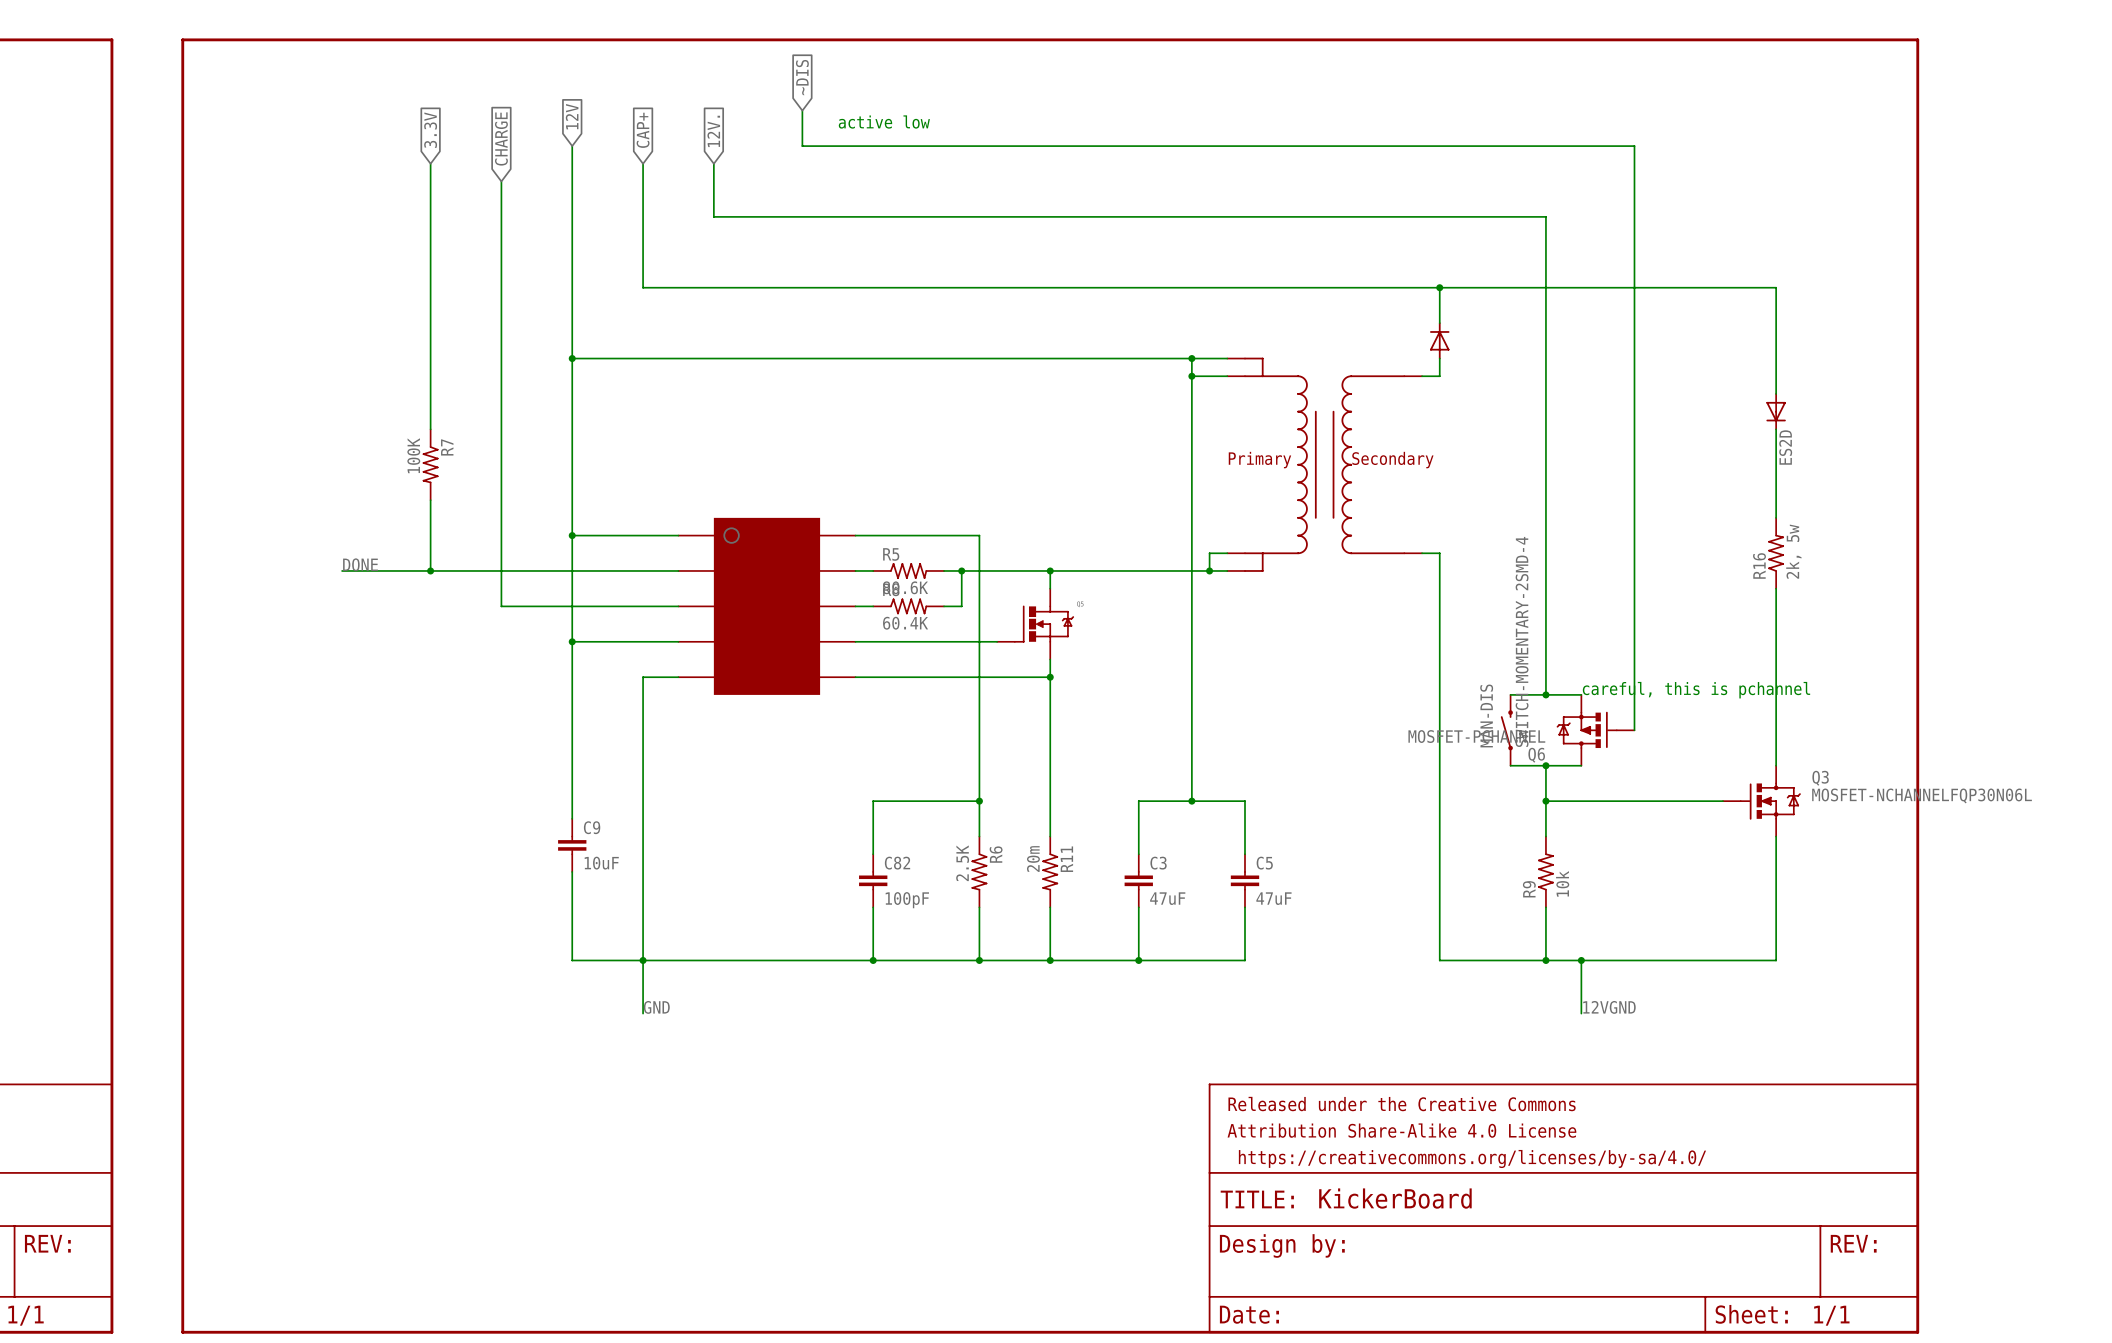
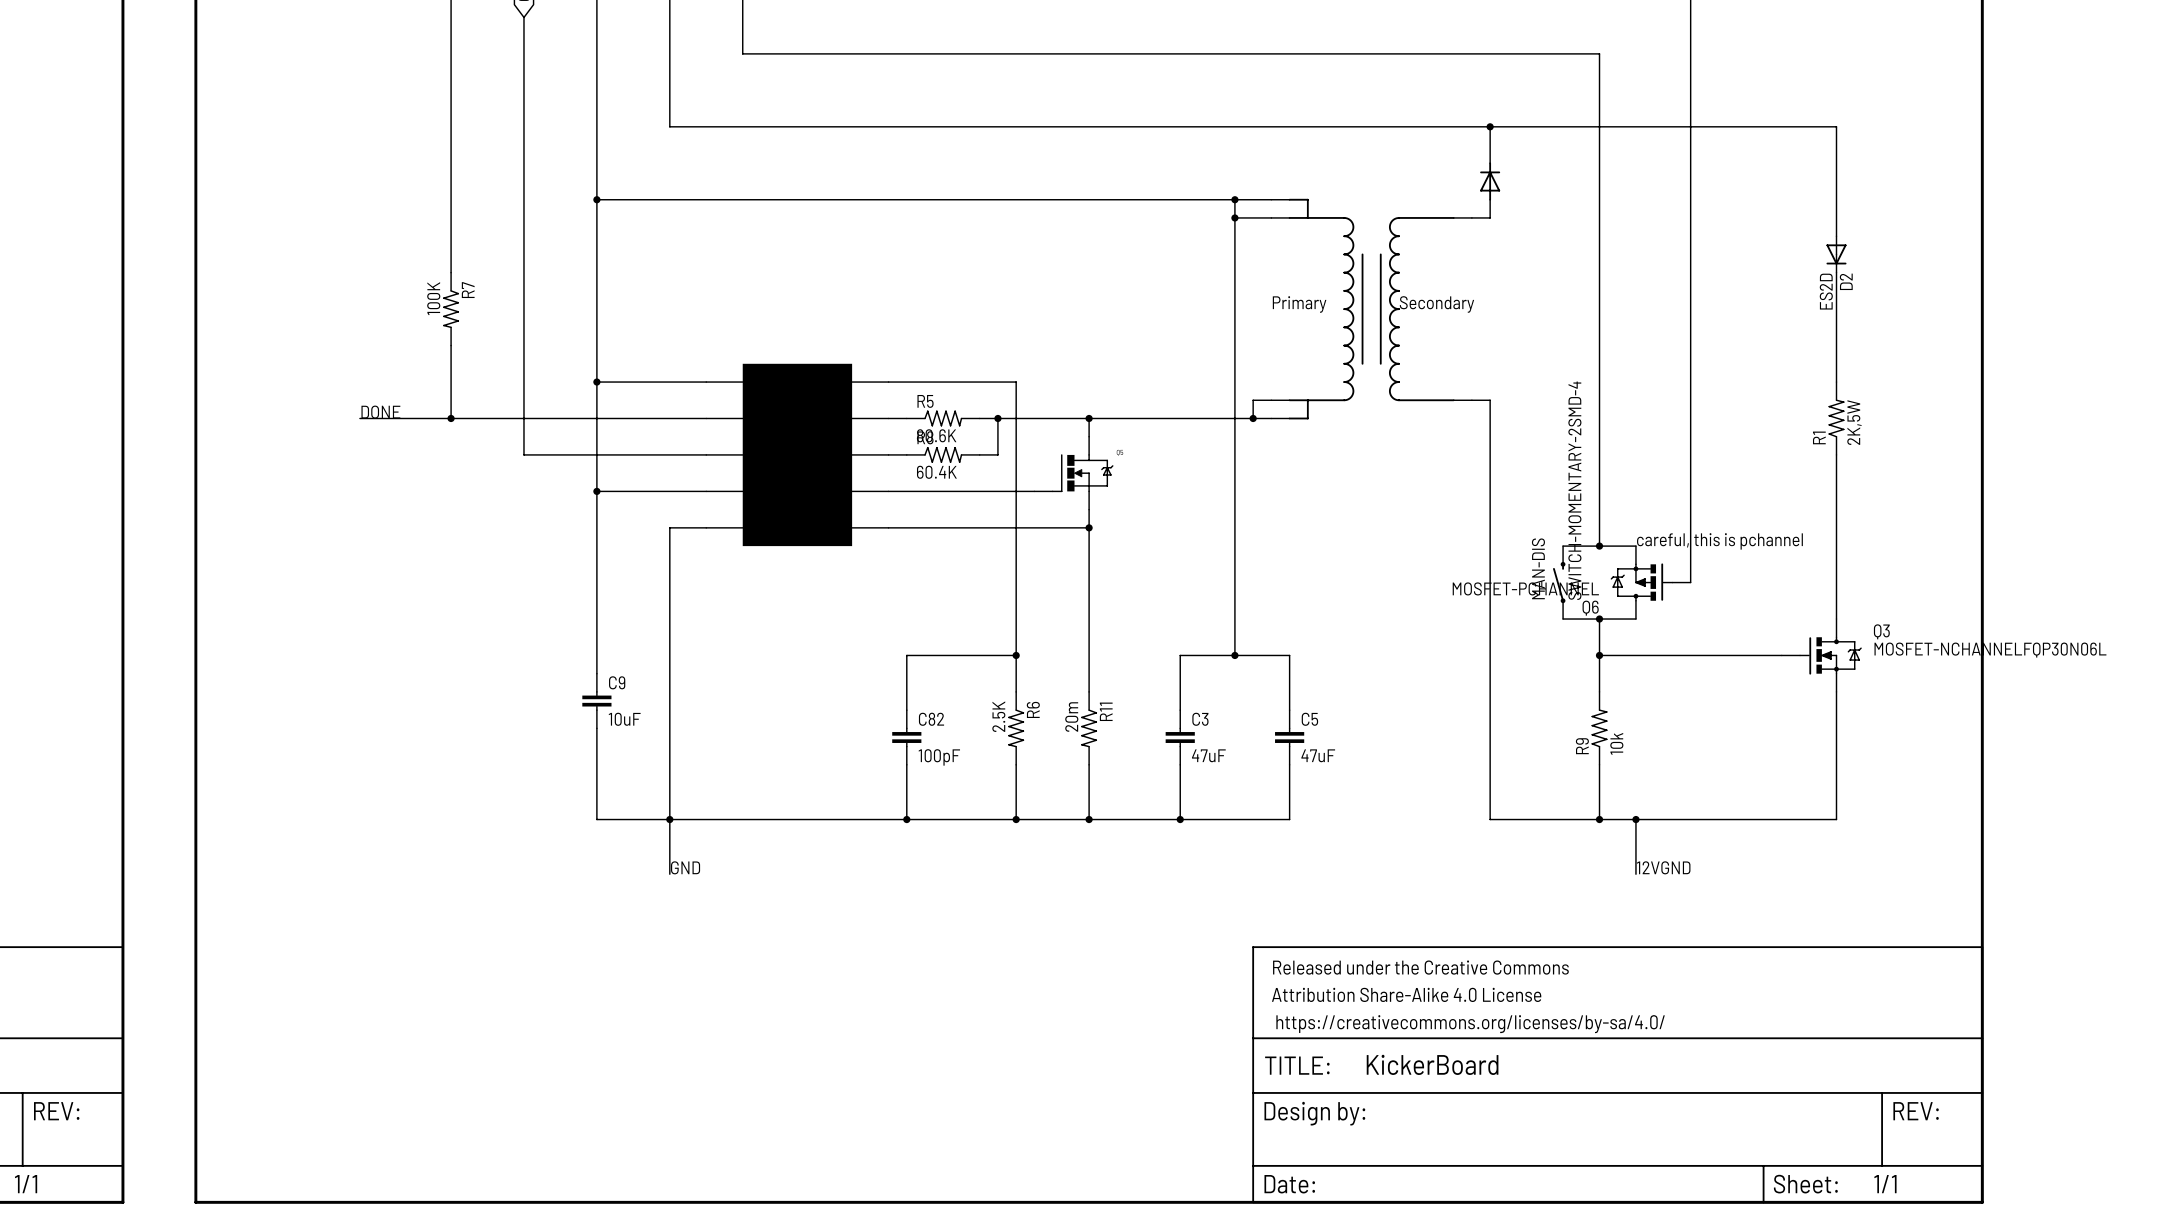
ES2D value: none -> ES2D (1826, 291)
ES2D name: ES2D (1785, 447) -> D2 (1846, 281)
R16: 2k, 5w (1776, 553) -> none
R1: none -> 2K,5W (1836, 418)

